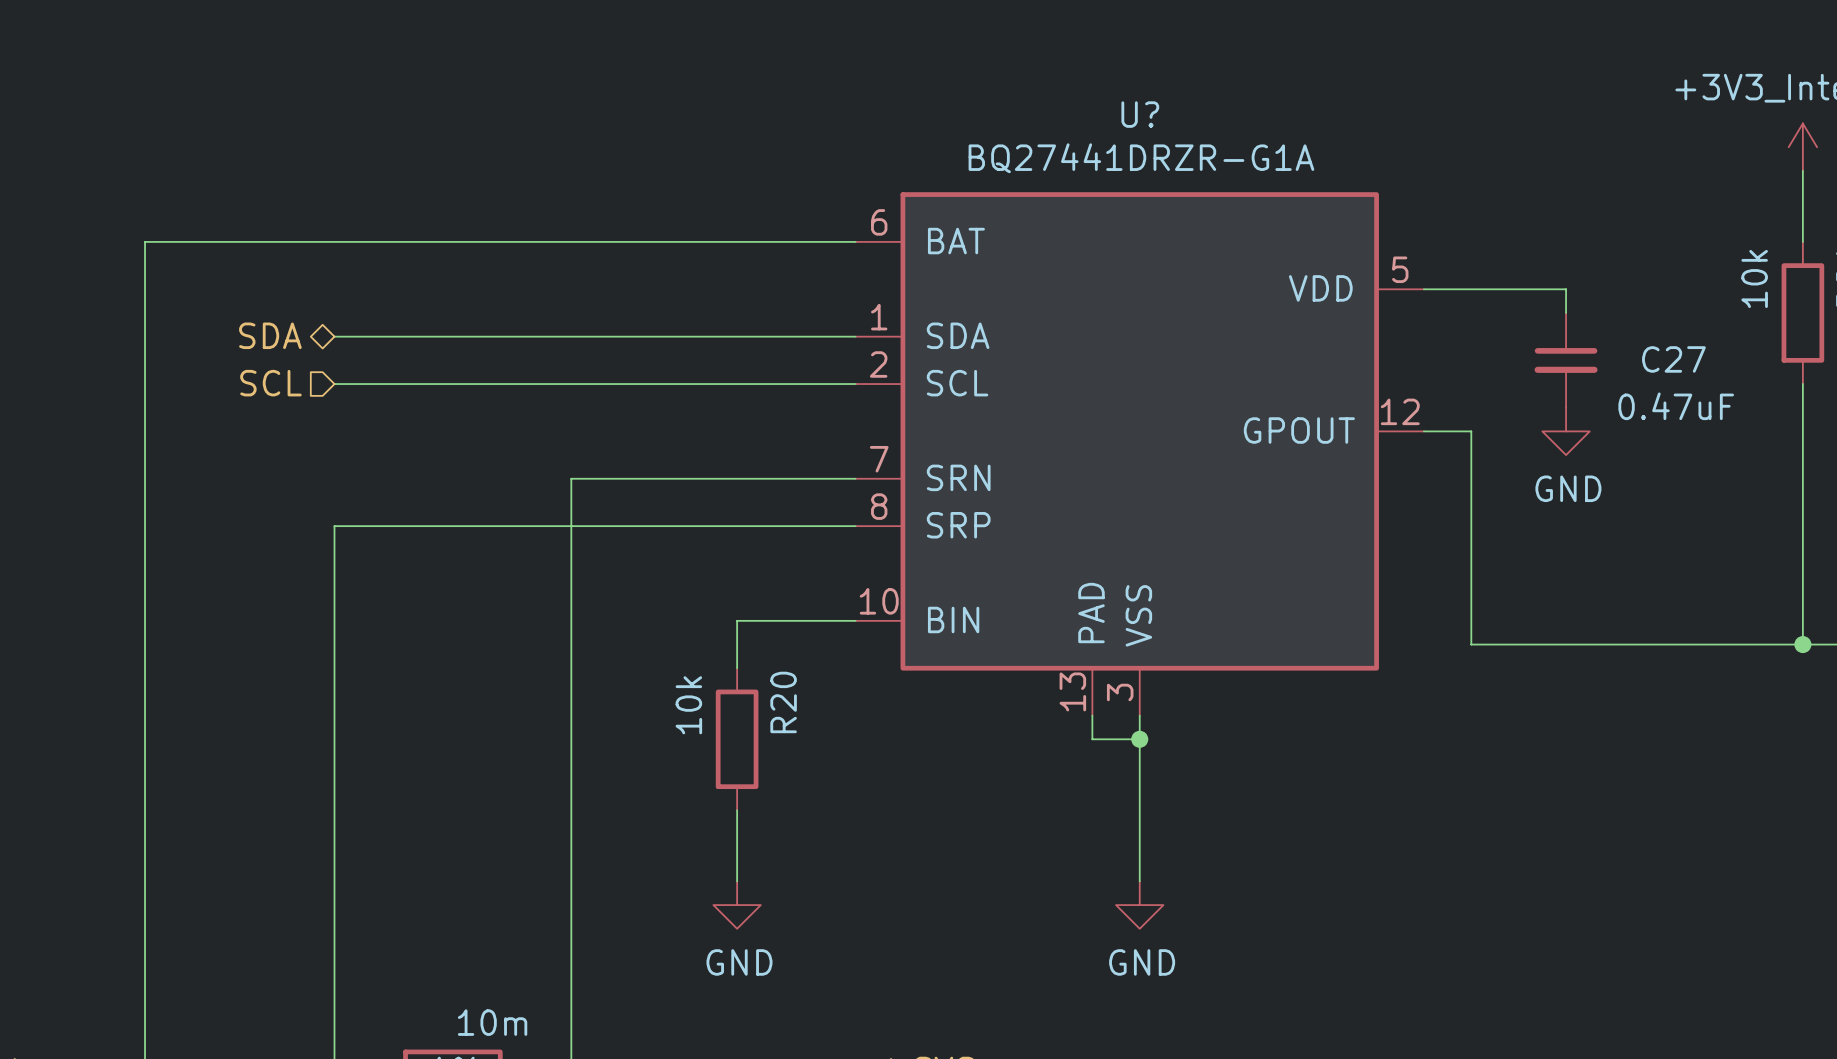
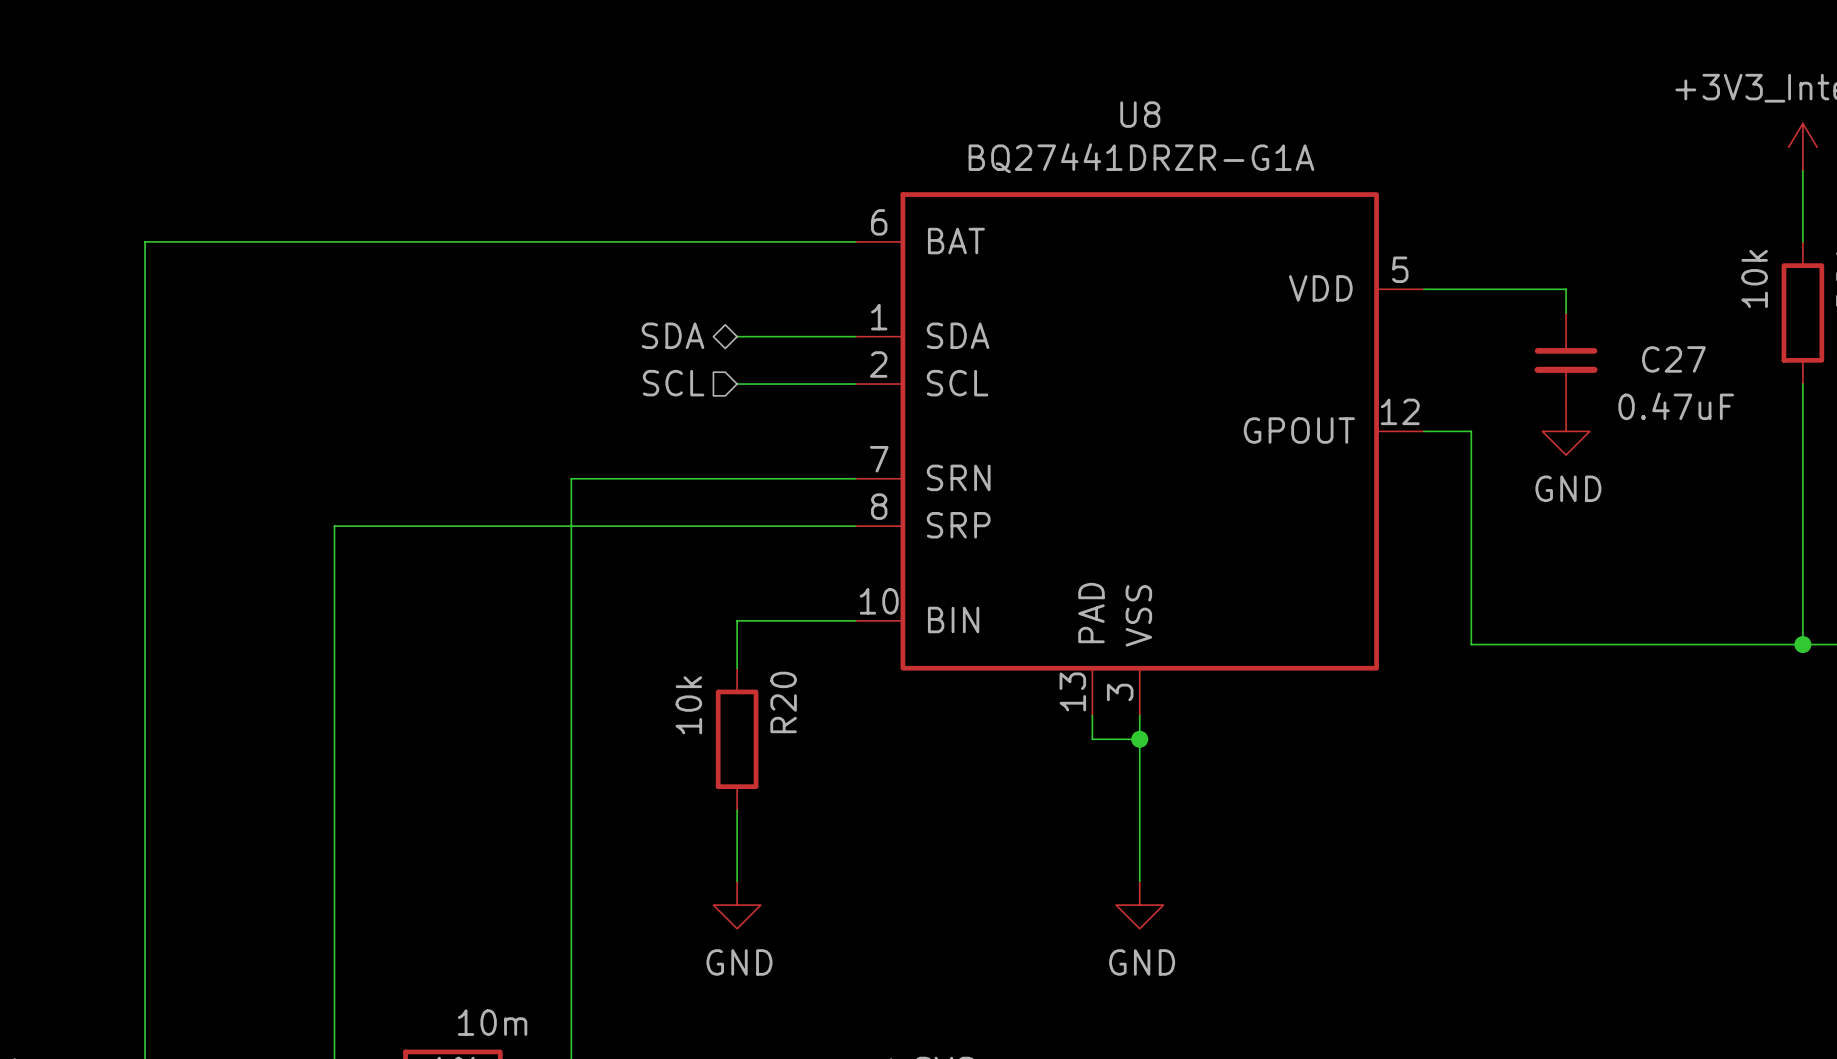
U? name: U? (1140, 114) -> U8 (1140, 114)
hierarchical label position: SDA (270, 335) -> SDA (673, 335)
wire: (334, 336) (737, 336) -> none
hierarchical label position: SCL (270, 383) -> SCL (673, 383)
wire: (334, 384) (737, 384) -> none

